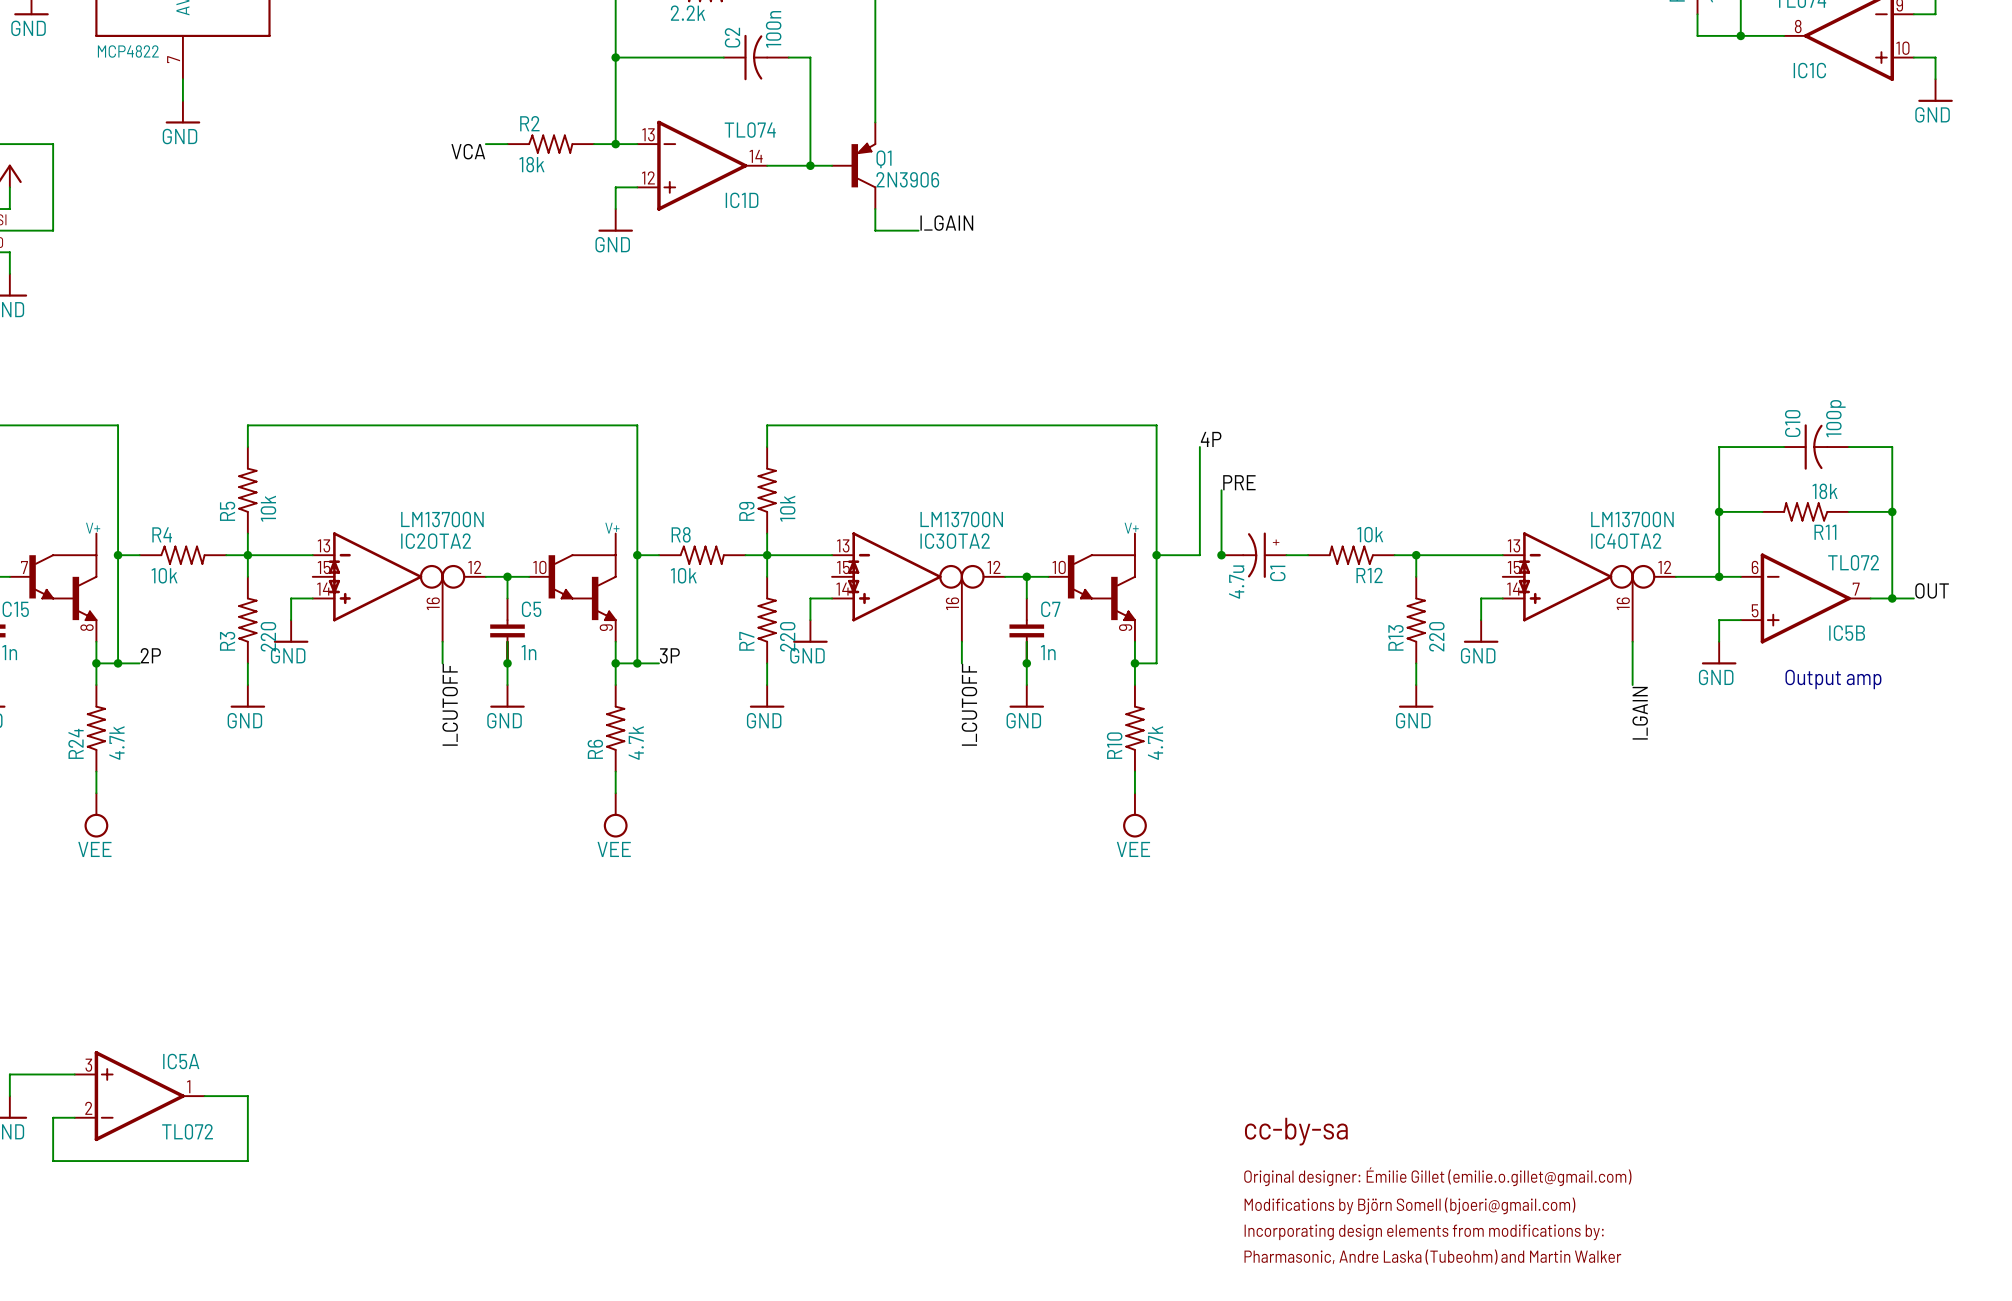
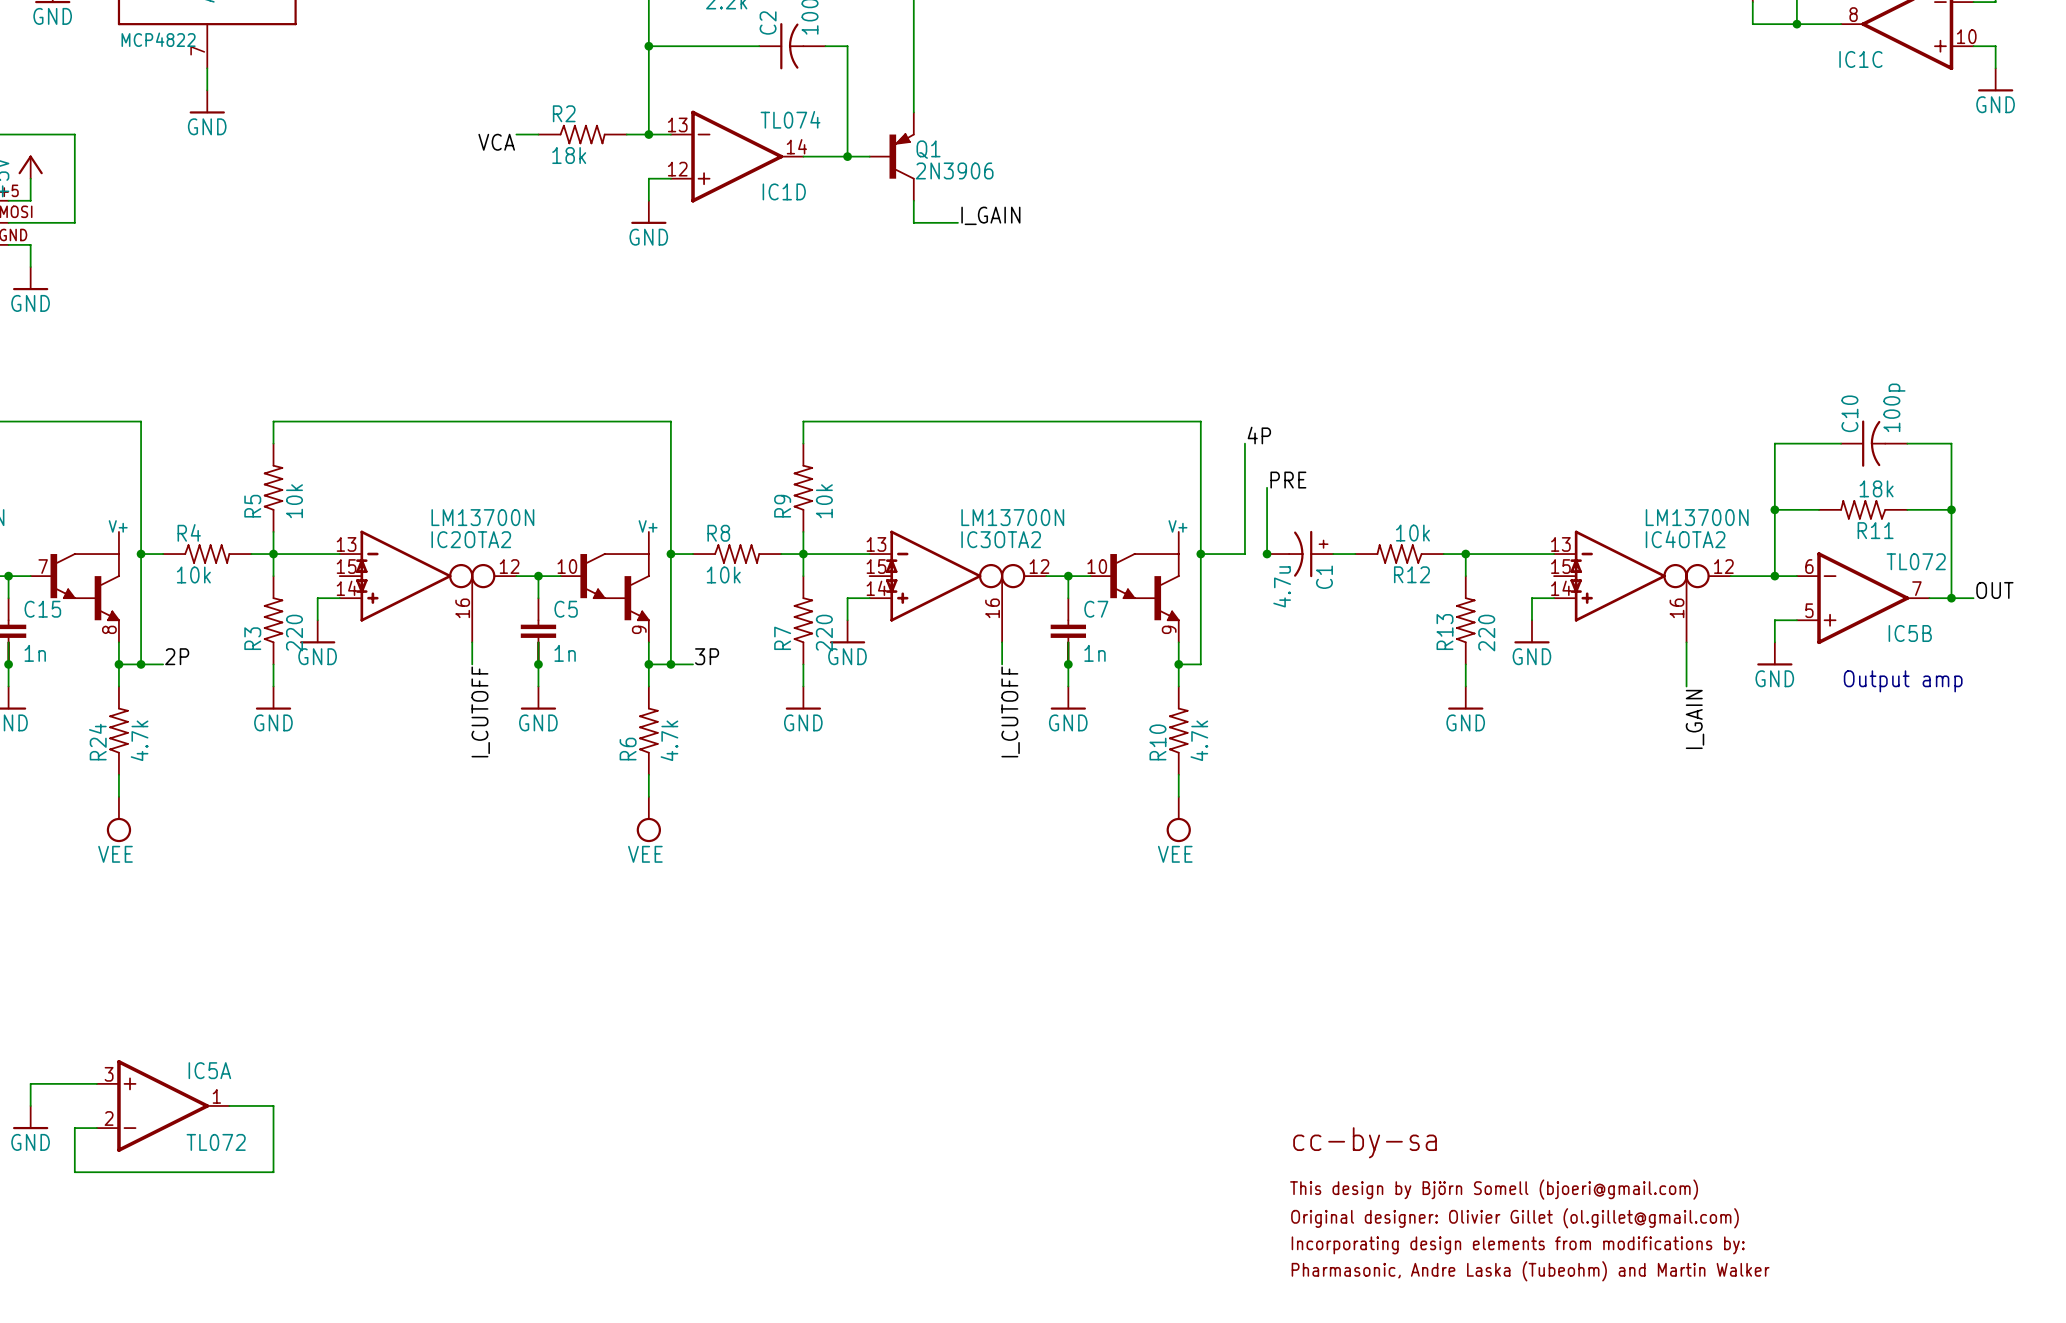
text: Original designer: Émilie Gillet (emilie.o.gillet@gmail.com) (1437, 1176) -> This design by Björn Somell (bjoeri@gmail.com) (1494, 1189)
text: Modifications by Björn Somell (bjoeri@gmail.com) (1409, 1205) -> Original designer: Olivier Gillet (ol.gillet@gmail.com) (1514, 1218)

